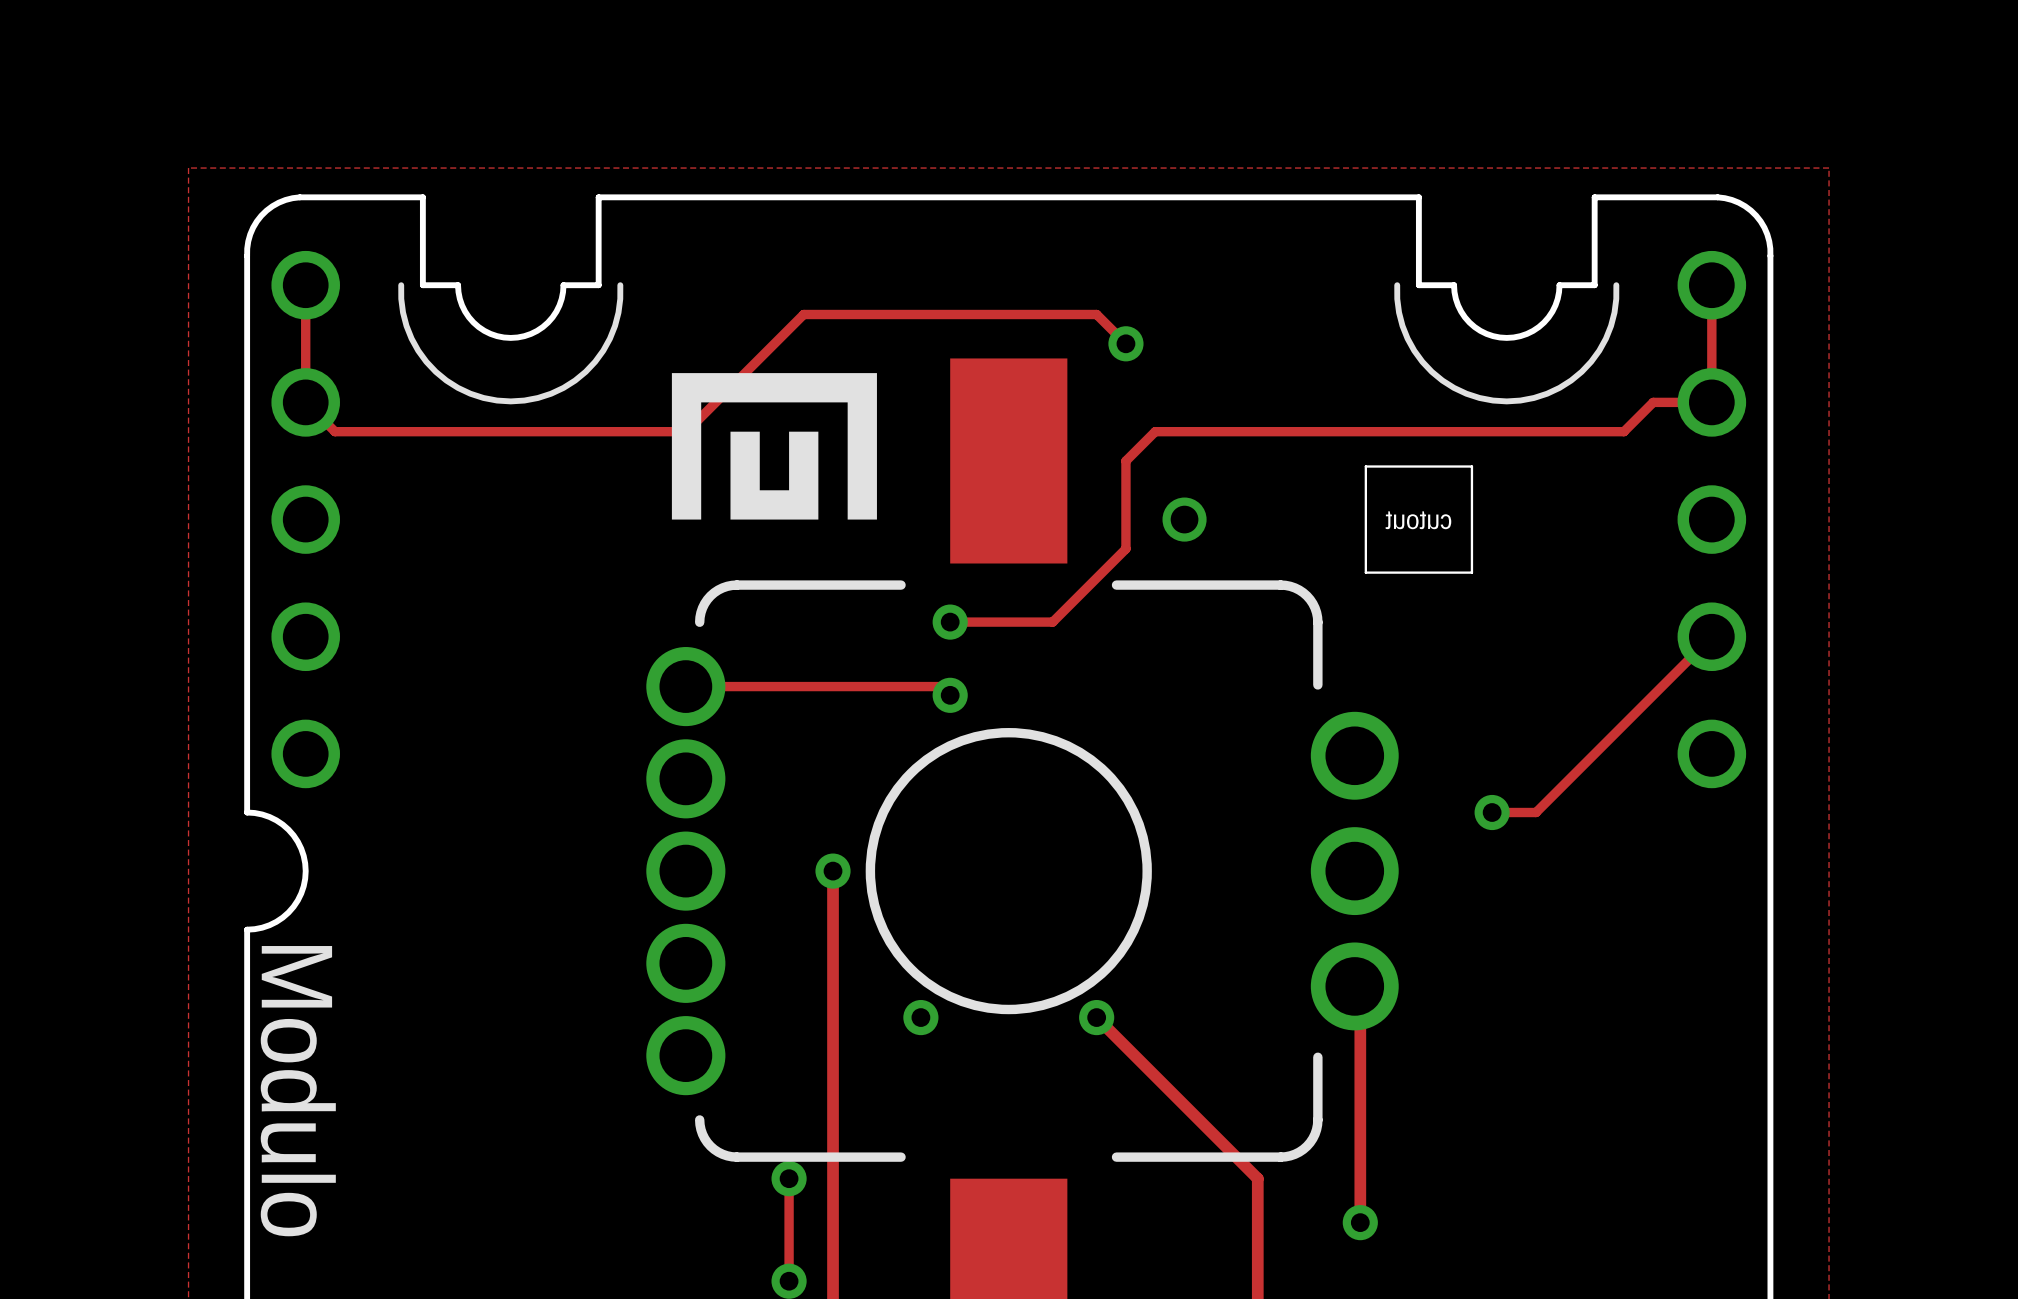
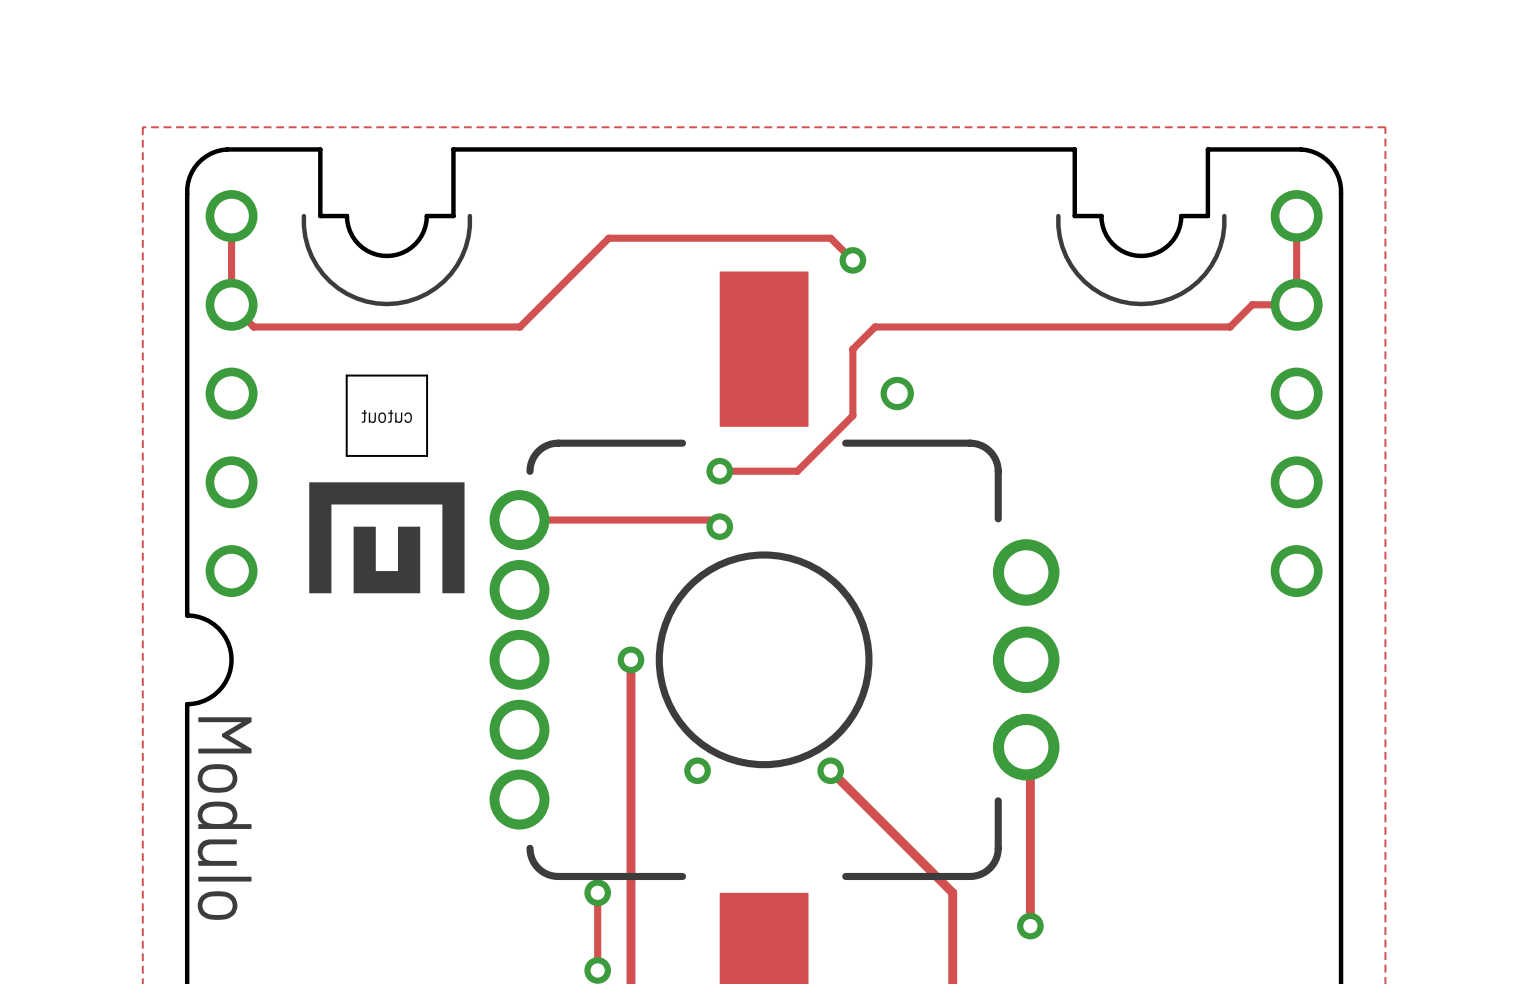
drawing position: (774, 446) -> (386, 537)
part position: (1418, 519) -> (386, 415)
track: (1711, 636) (1536, 812) (1492, 812) -> none
via: (1492, 812) -> none

